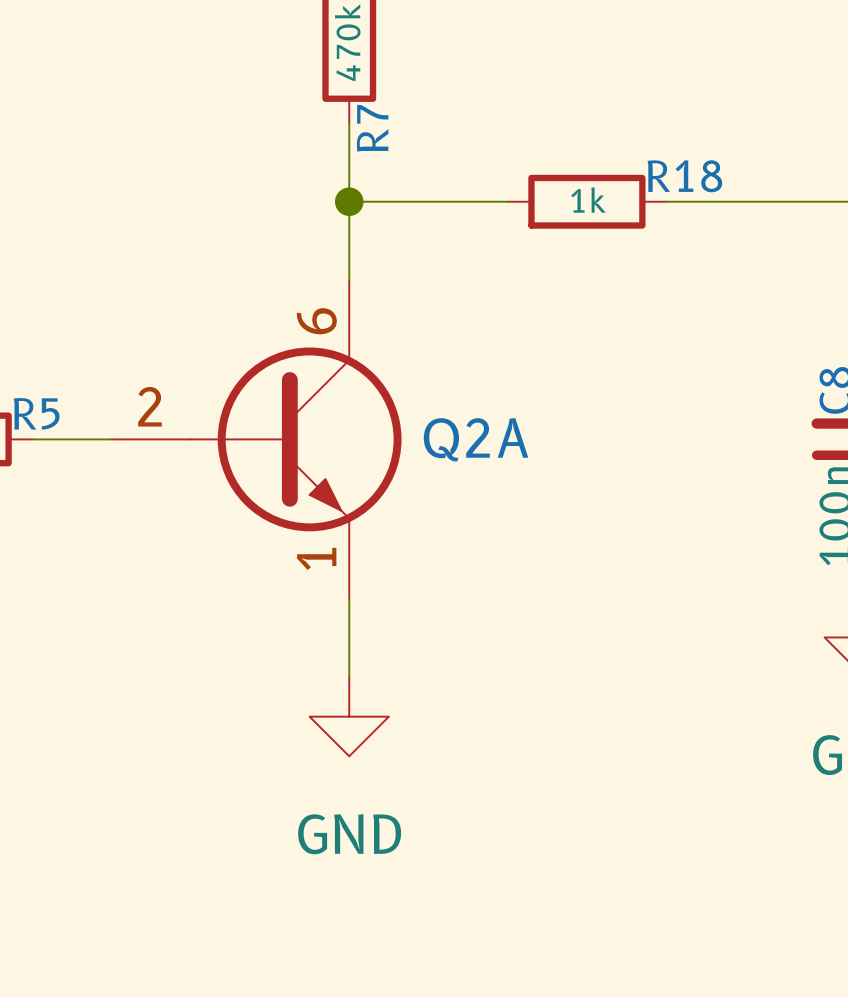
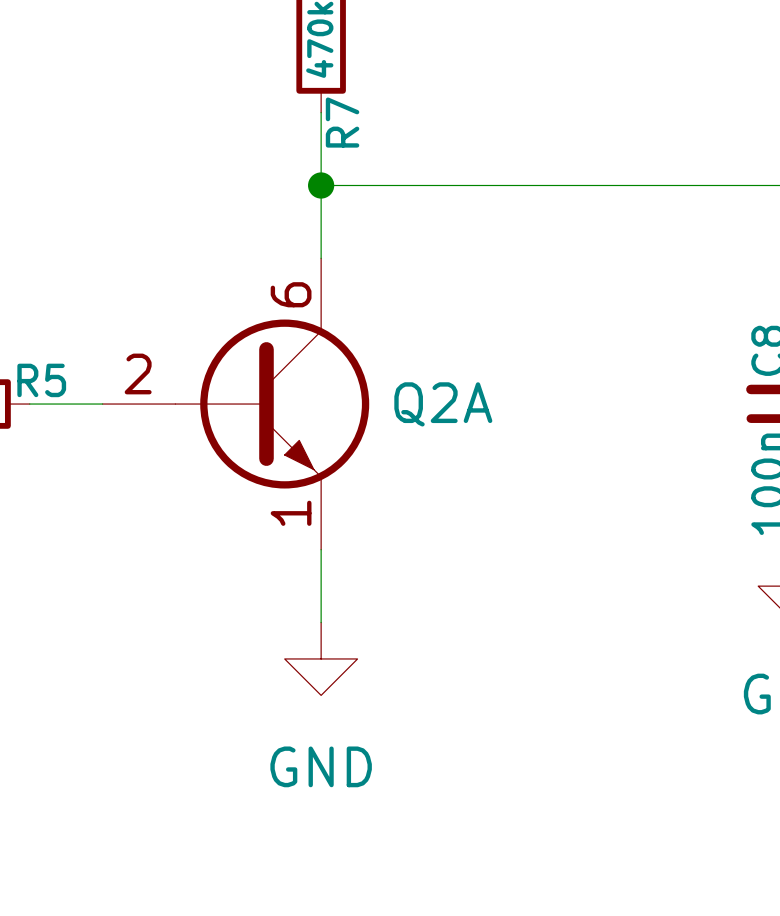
wire: none -> (466, 185) (612, 185)
R18: 1k (586, 201) -> none

